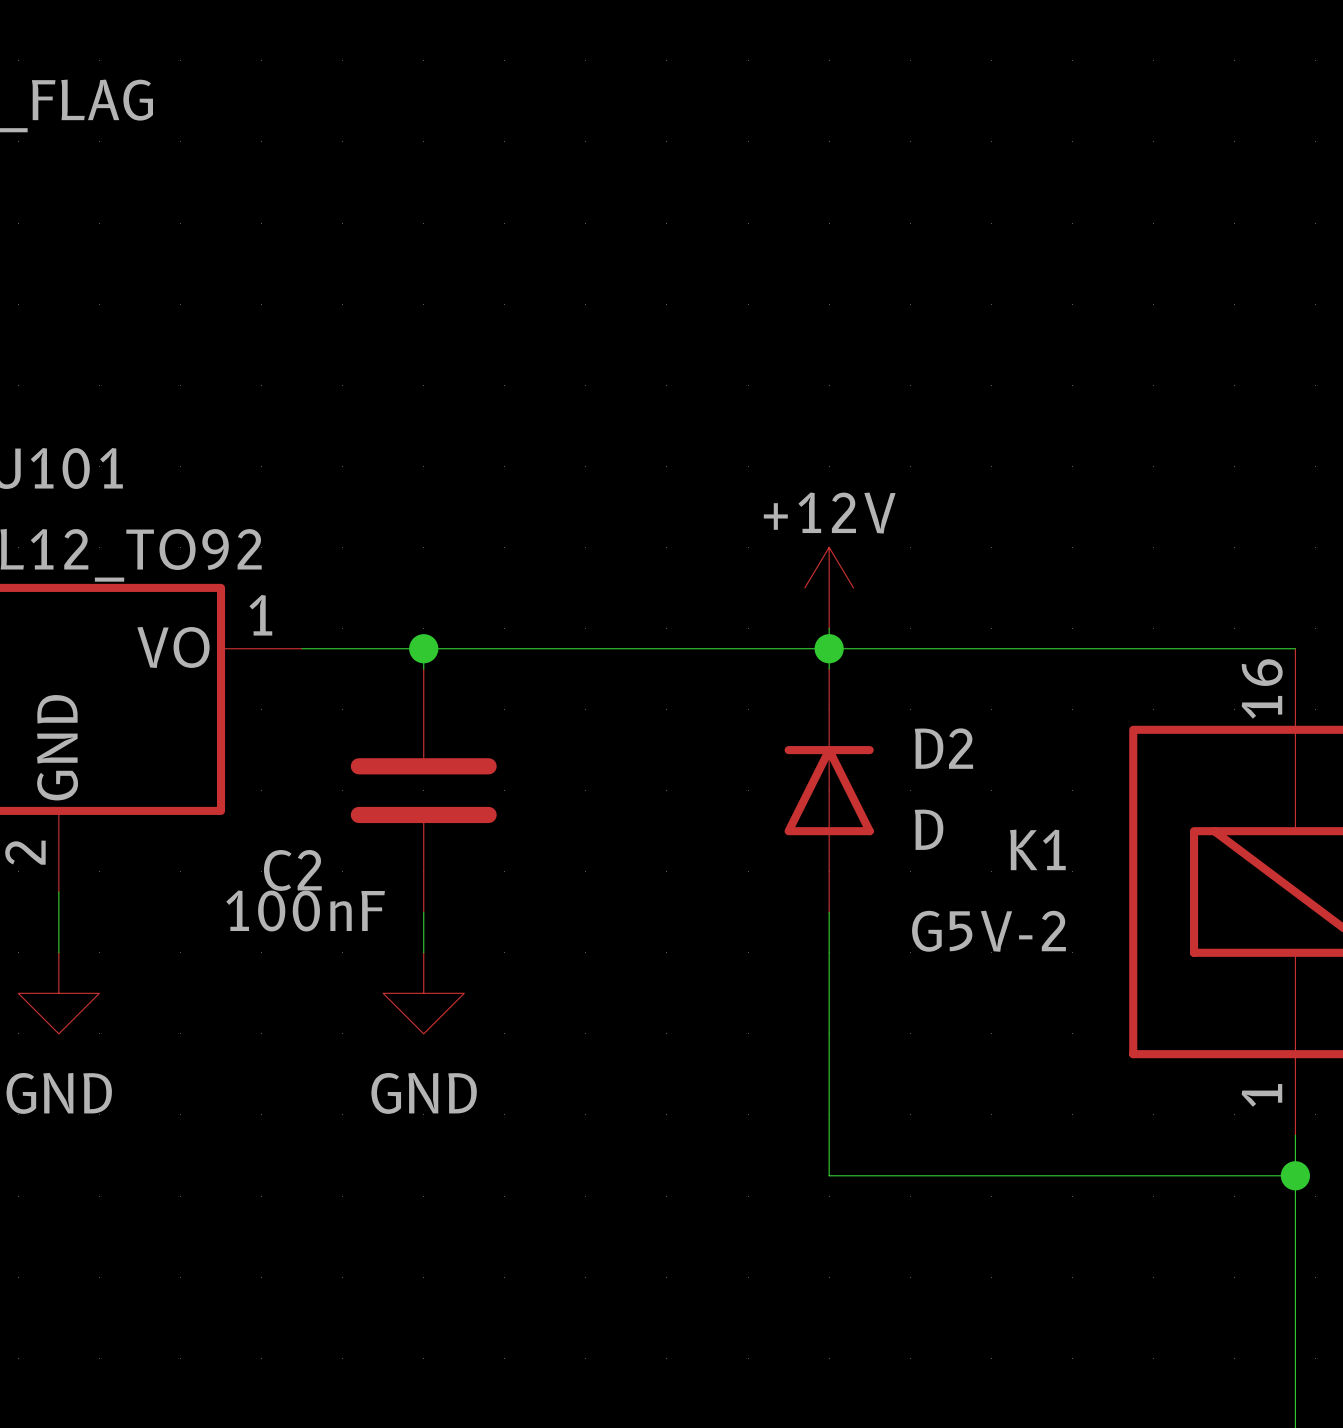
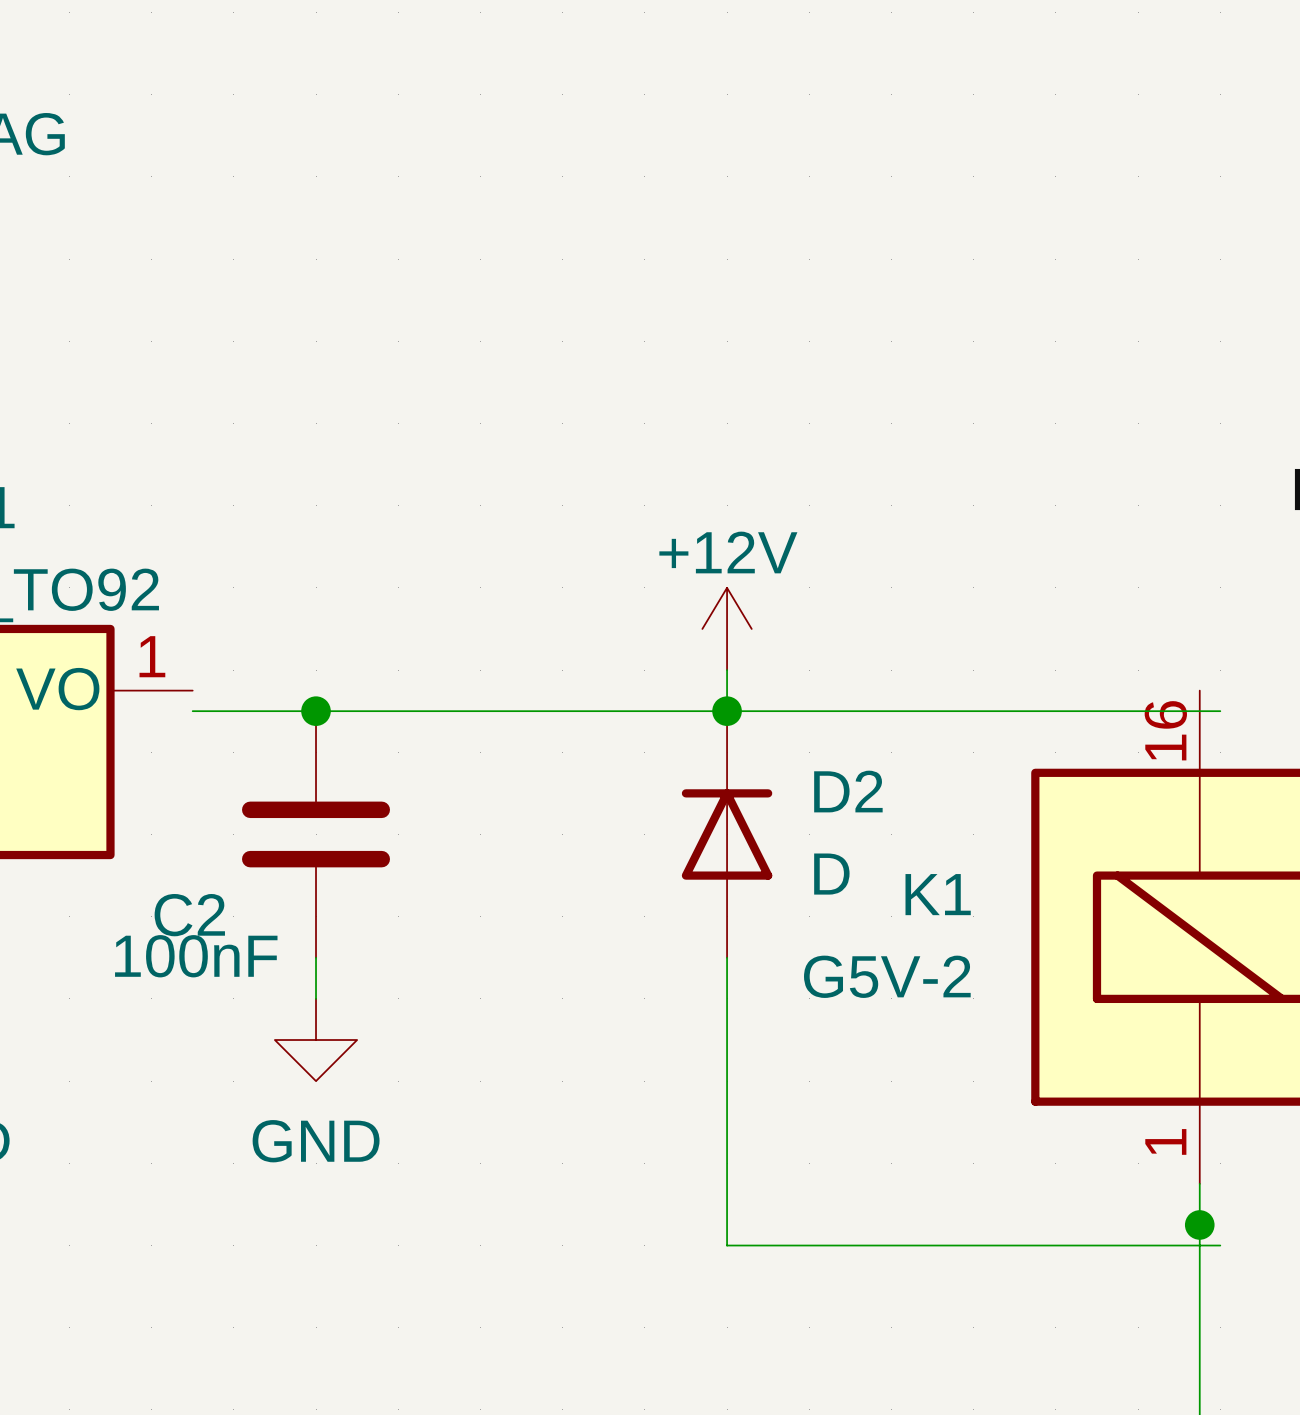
wire: (302, 648) (1295, 648) -> none
junction position: (423, 648) -> (316, 711)
junction position: (829, 648) -> (727, 711)
wire: none -> (192, 711) (1220, 711)
wire: (829, 1175) (1295, 1175) -> (727, 1224) (727, 1245) (1220, 1245)

